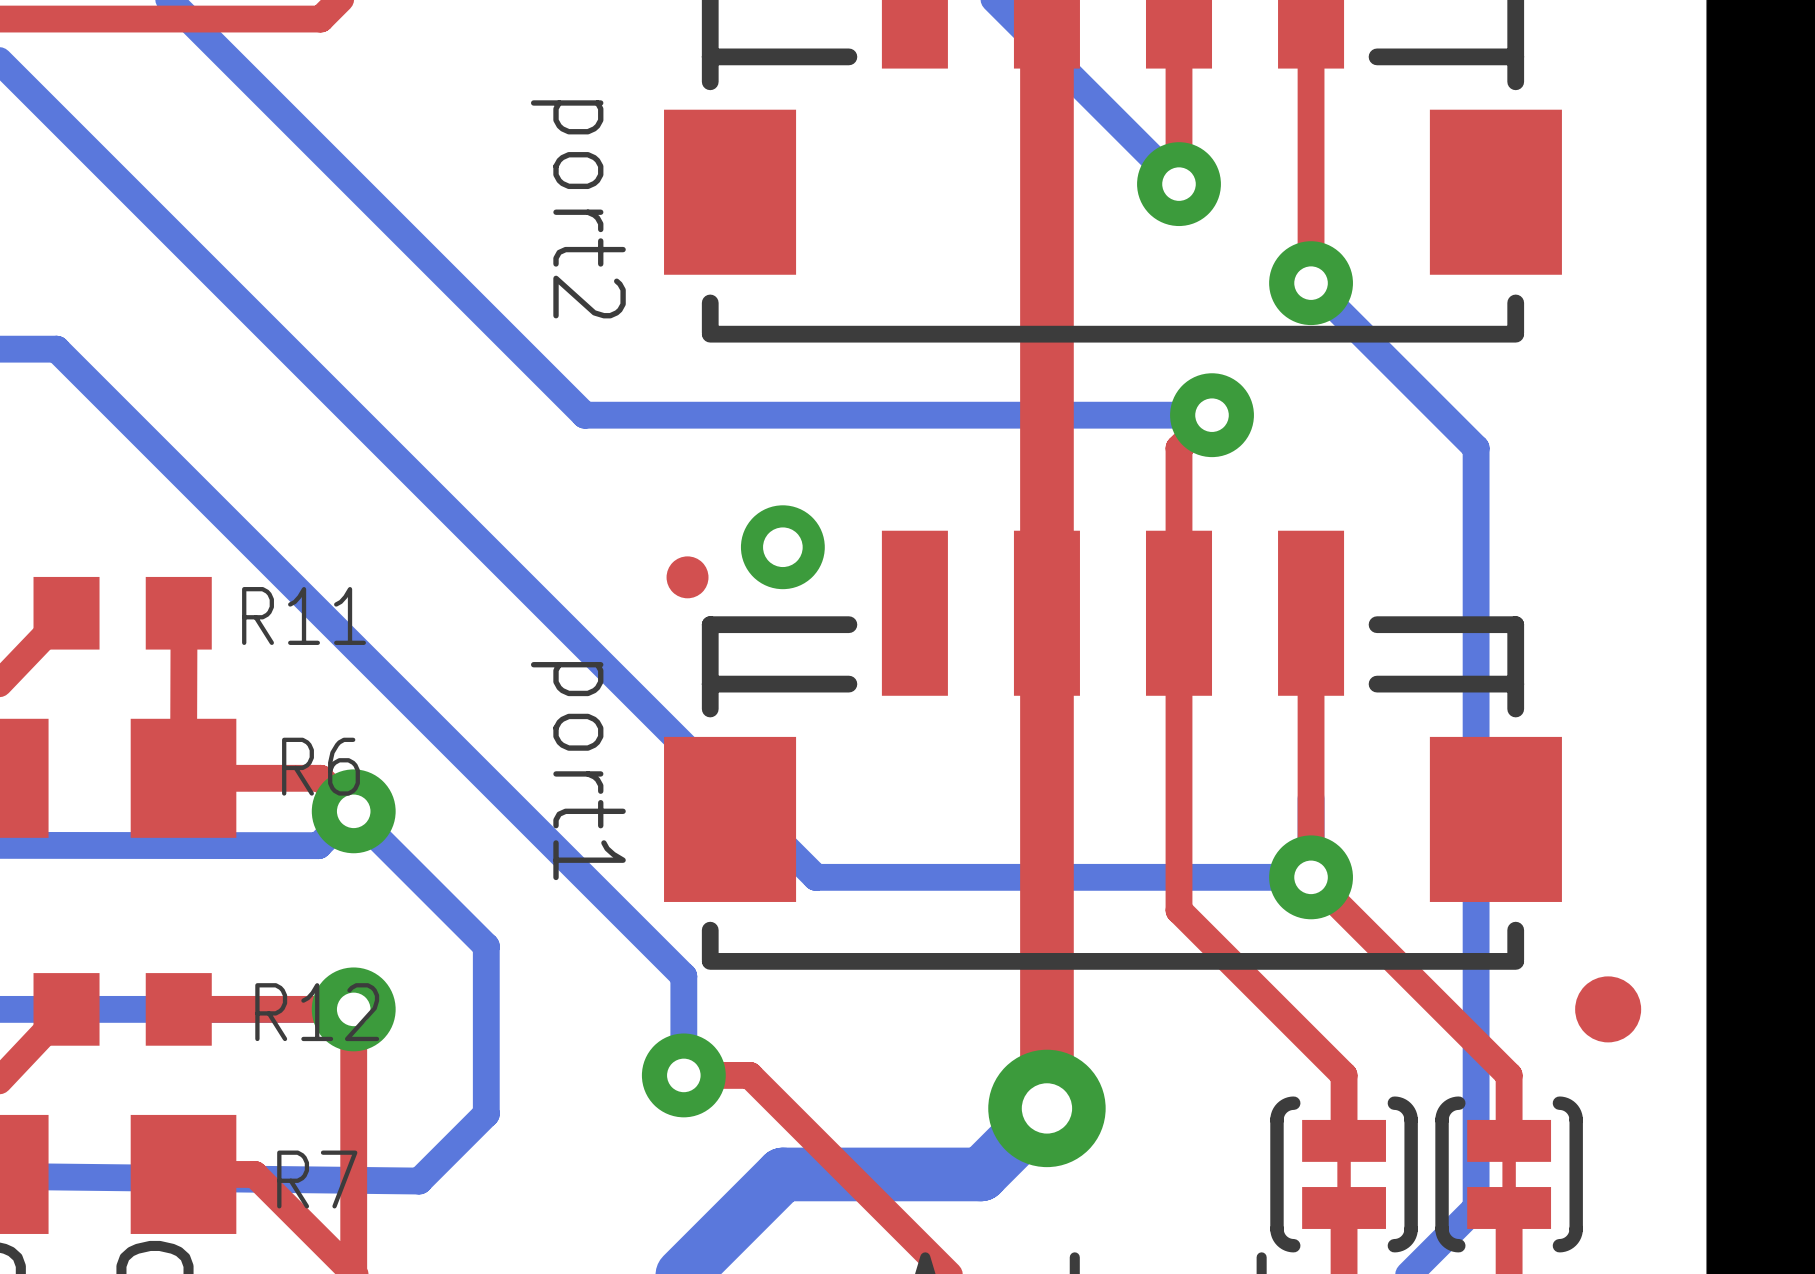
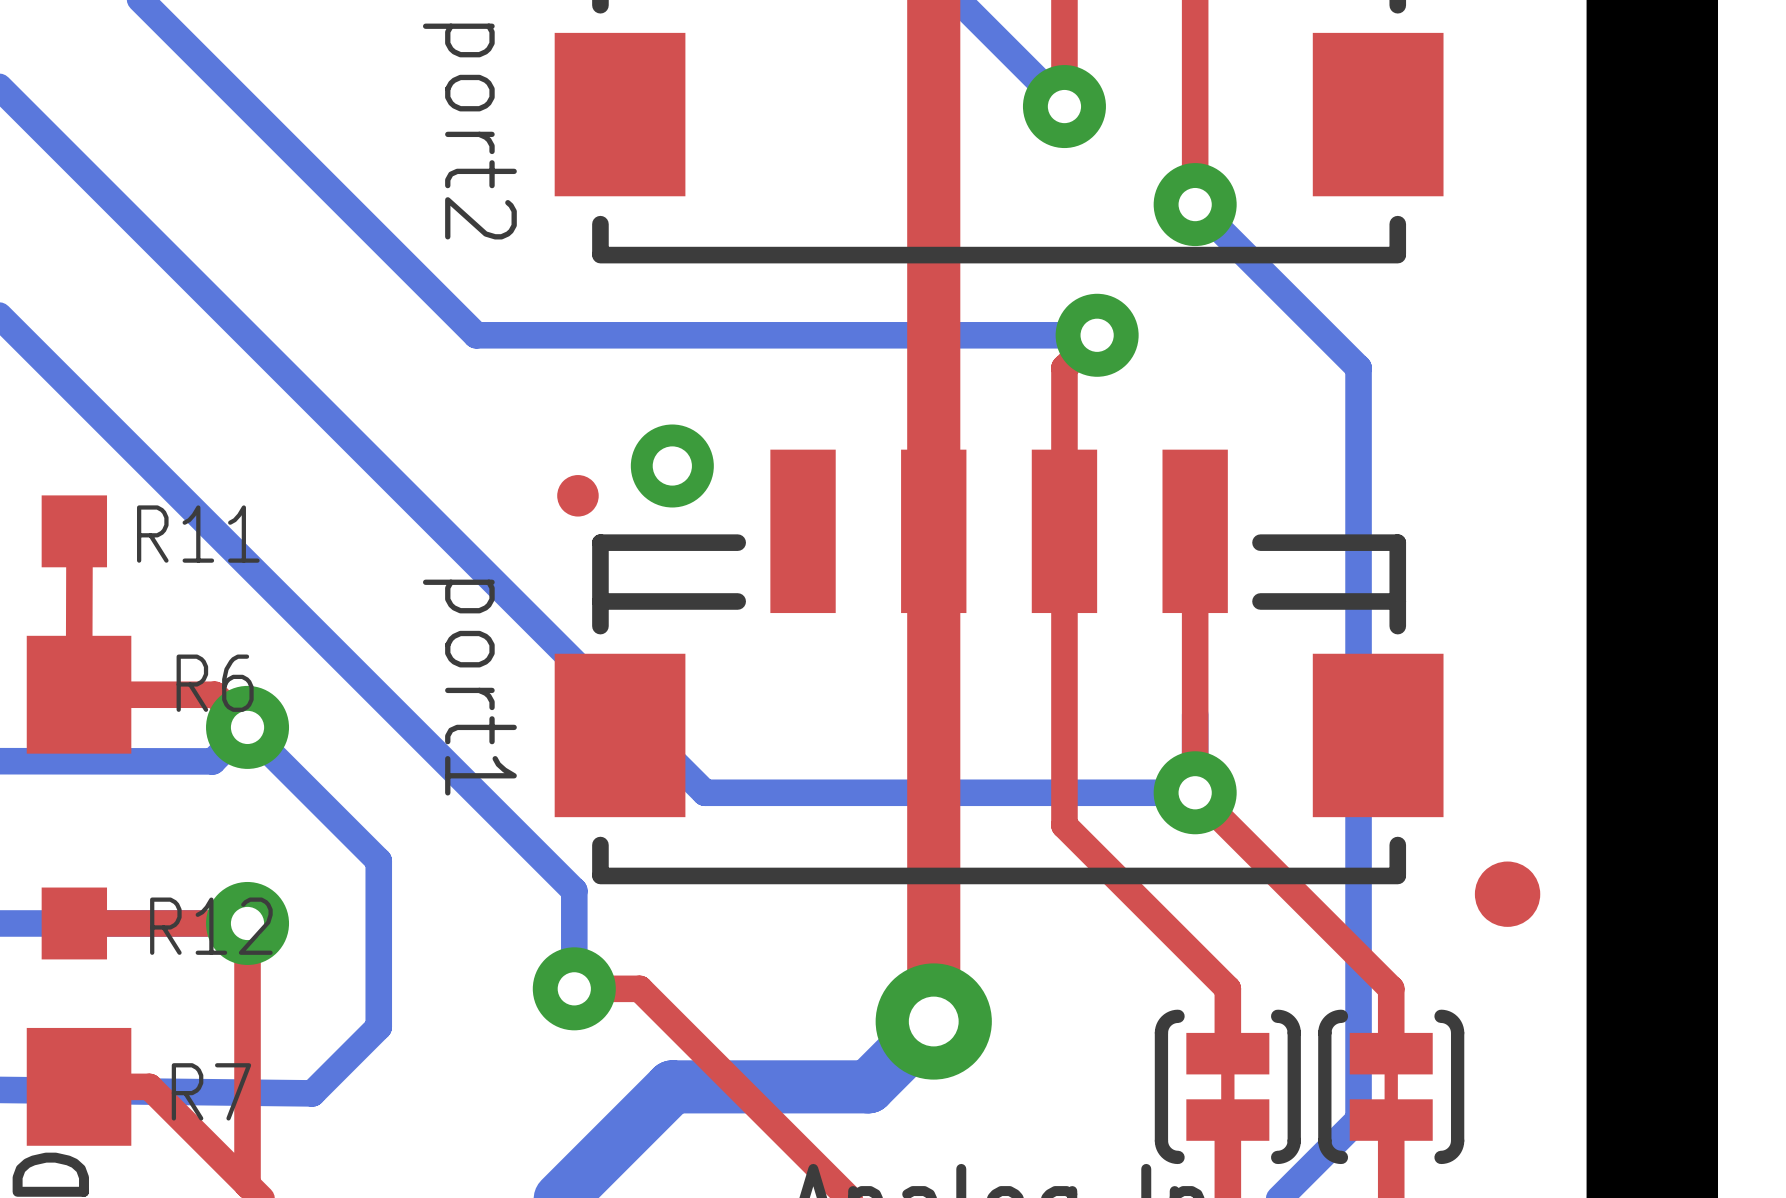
part position: (1608, 1009) -> (1507, 894)

